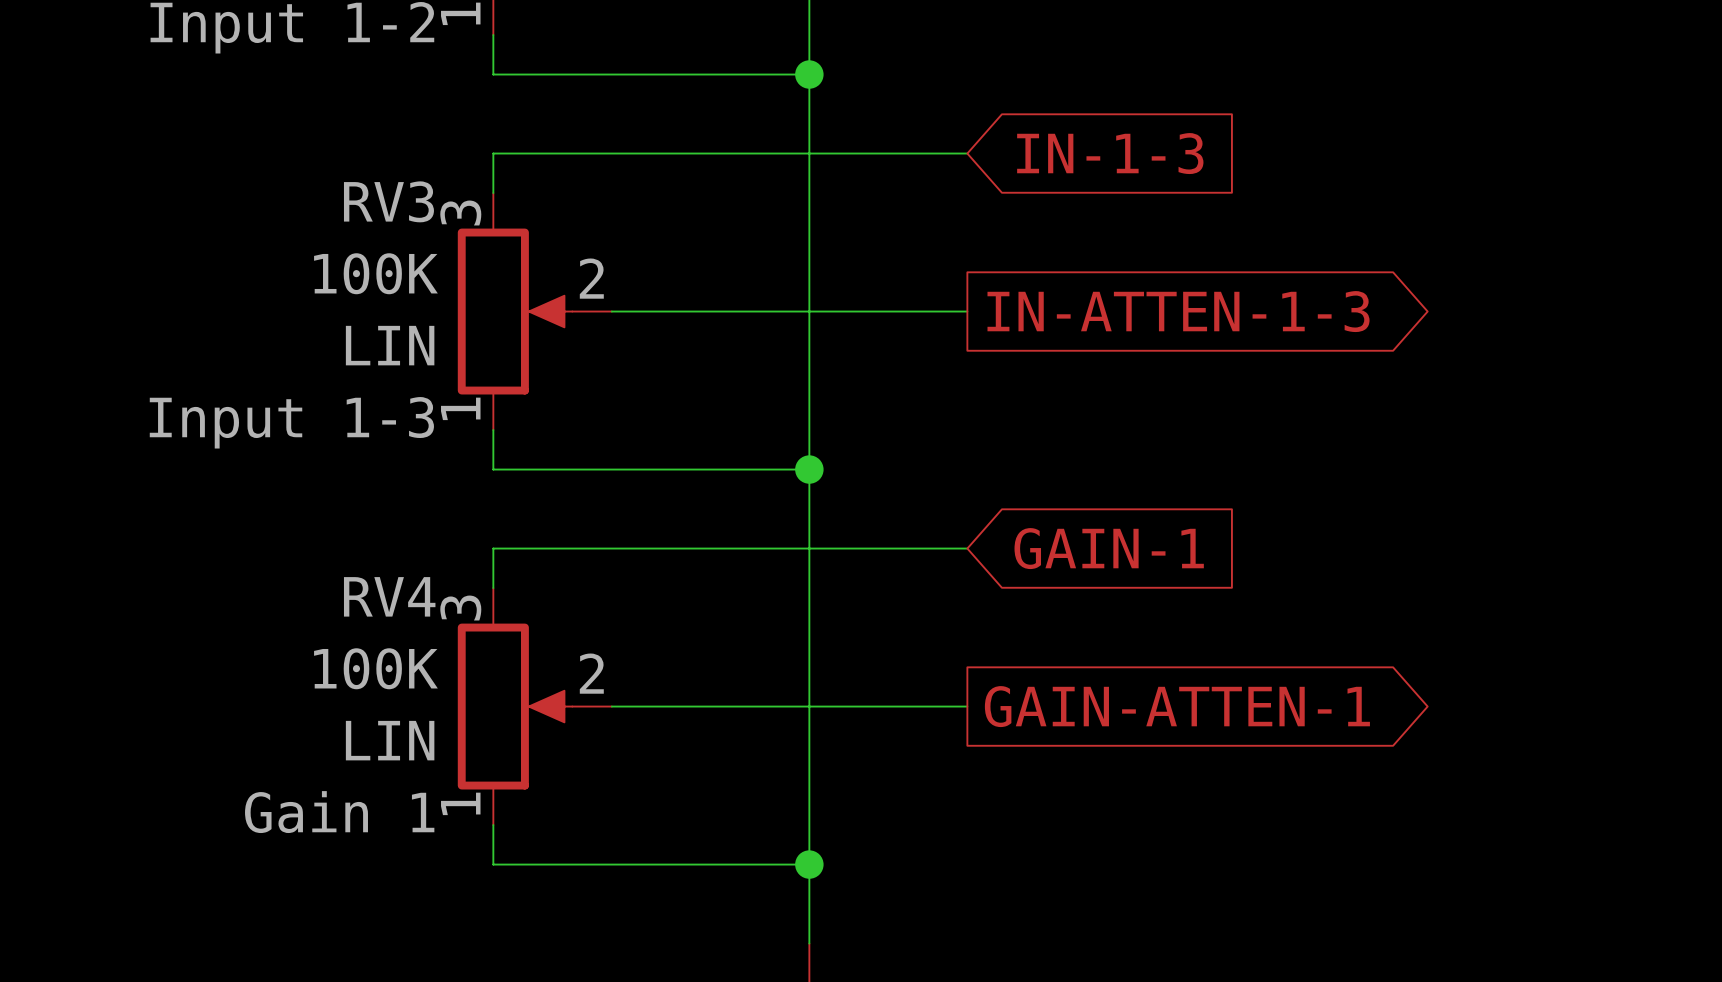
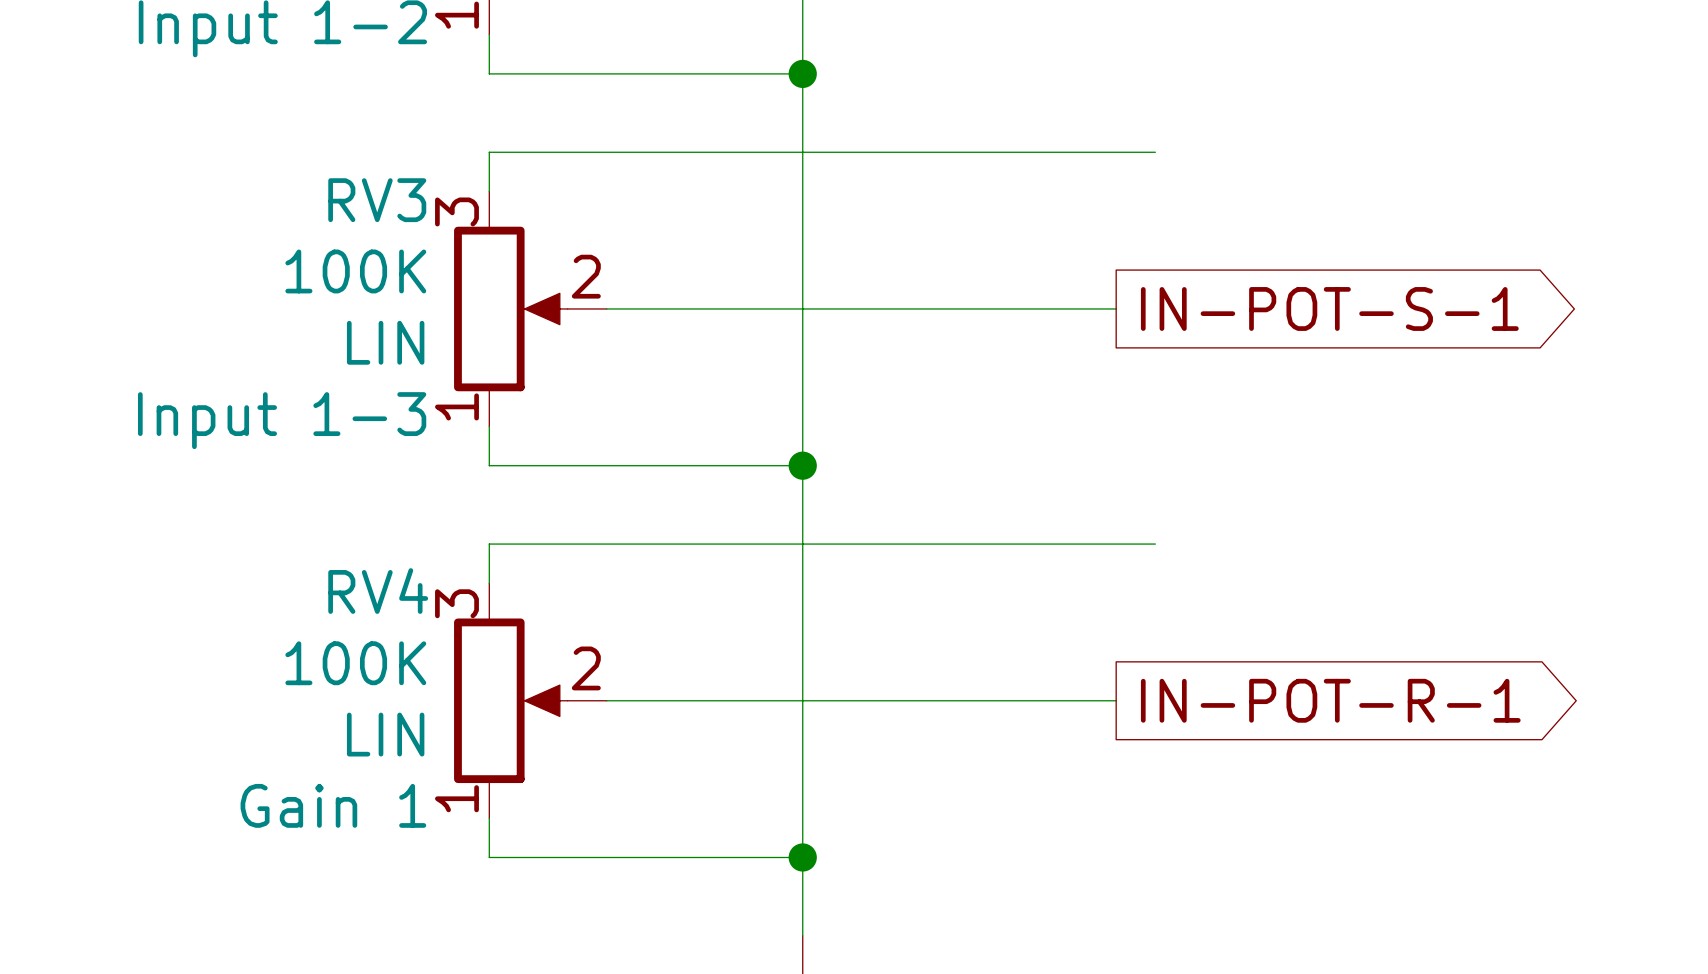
wire: none -> (959, 152) (1155, 152)
global label: IN-1-3 (1110, 153) -> none
wire: none -> (959, 308) (1116, 308)
global label: IN-ATTEN-1-3 (1178, 311) -> none
global label: none -> IN-POT-S-1 (1329, 308)
wire: none -> (959, 544) (1155, 544)
global label: GAIN-1 (1109, 548) -> none
wire: none -> (959, 700) (1116, 700)
global label: GAIN-ATTEN-1 (1177, 706) -> none
global label: none -> IN-POT-R-1 (1330, 700)

